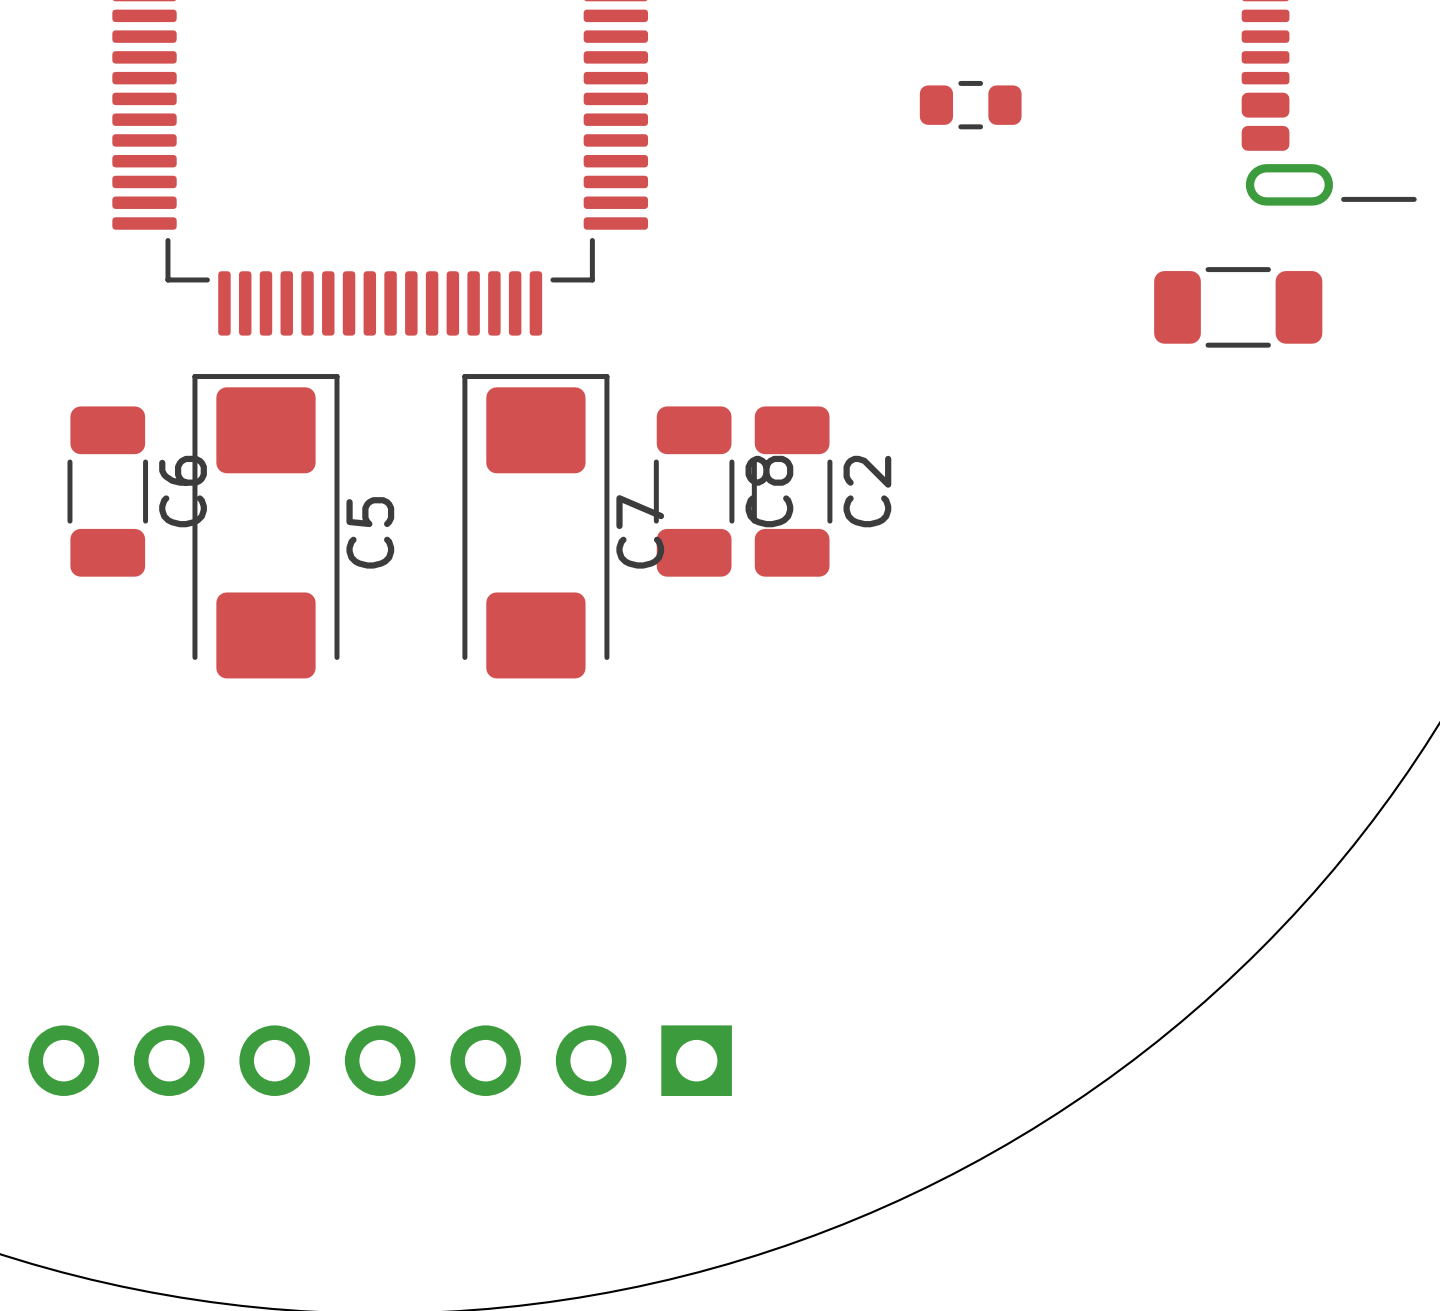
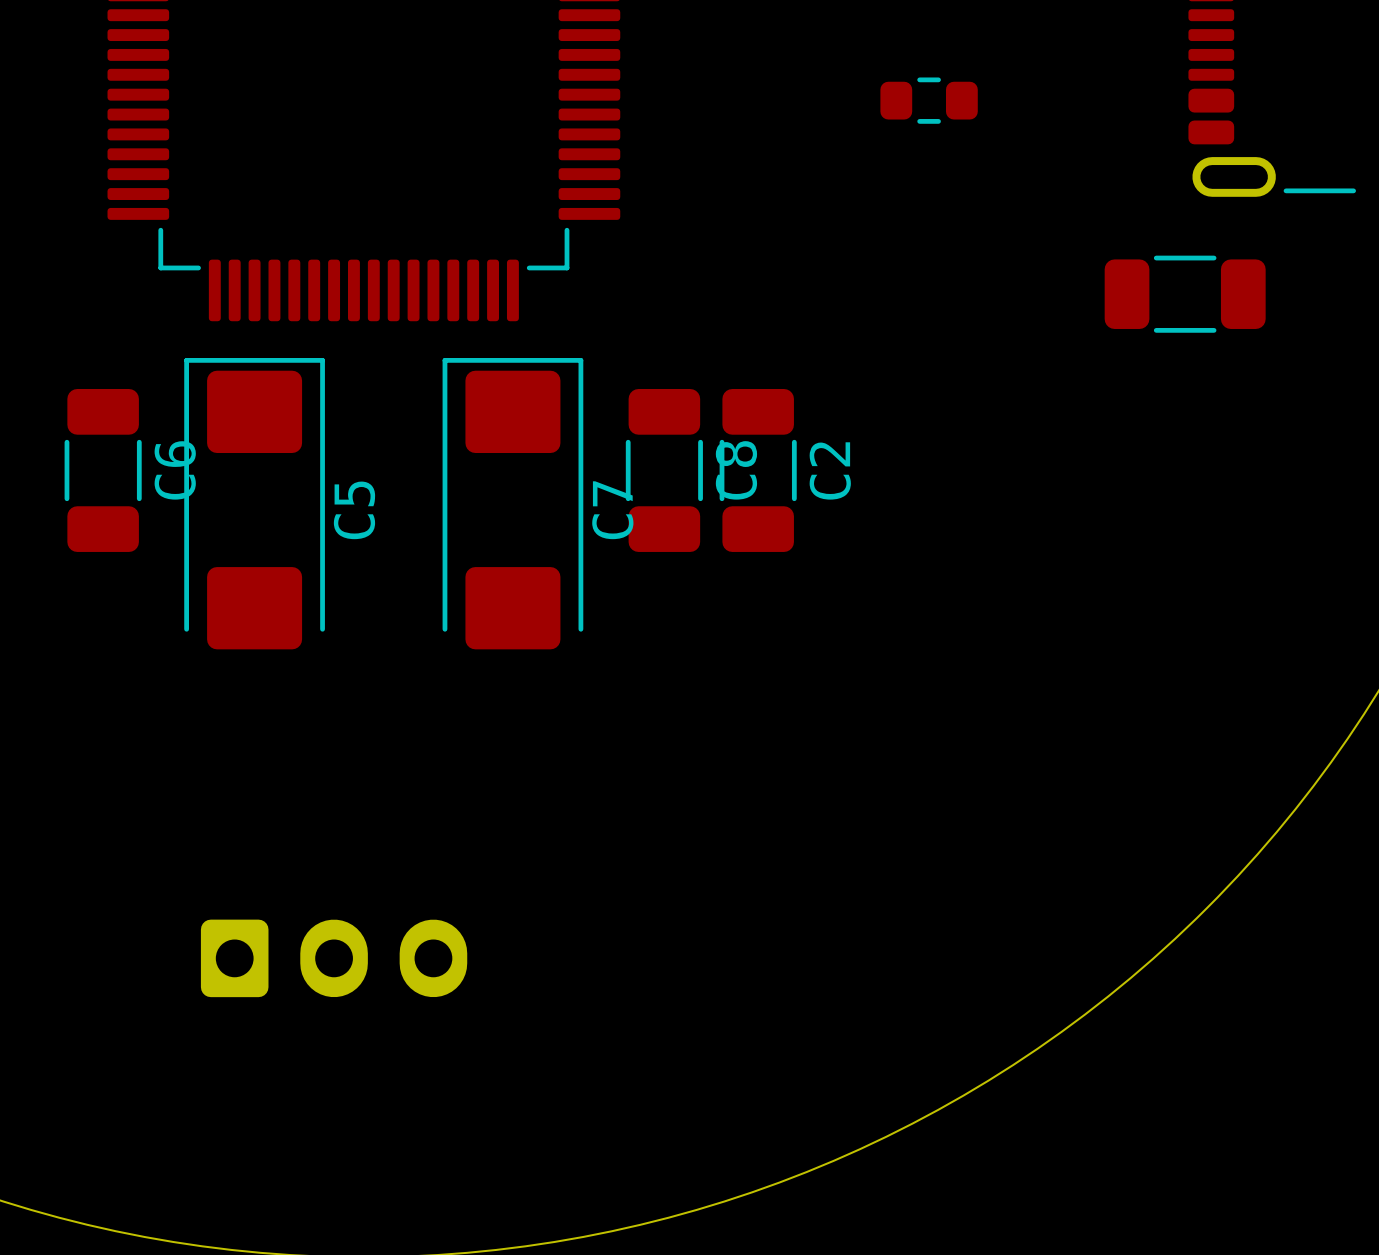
part: none -> (334, 958)
part: (380, 1060) -> none

